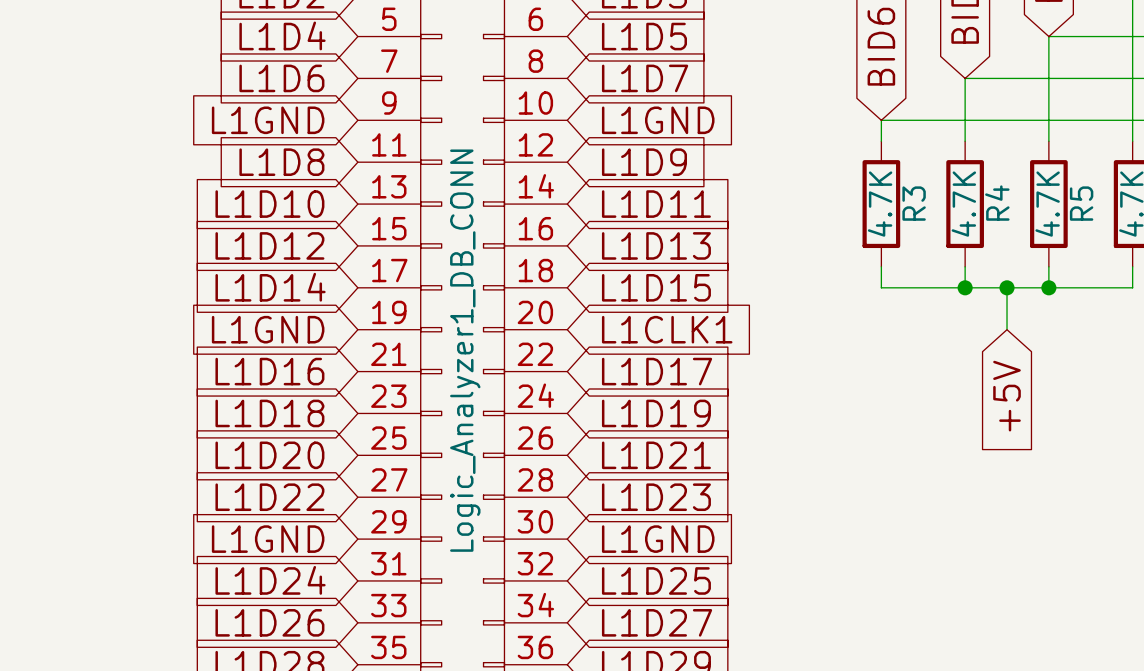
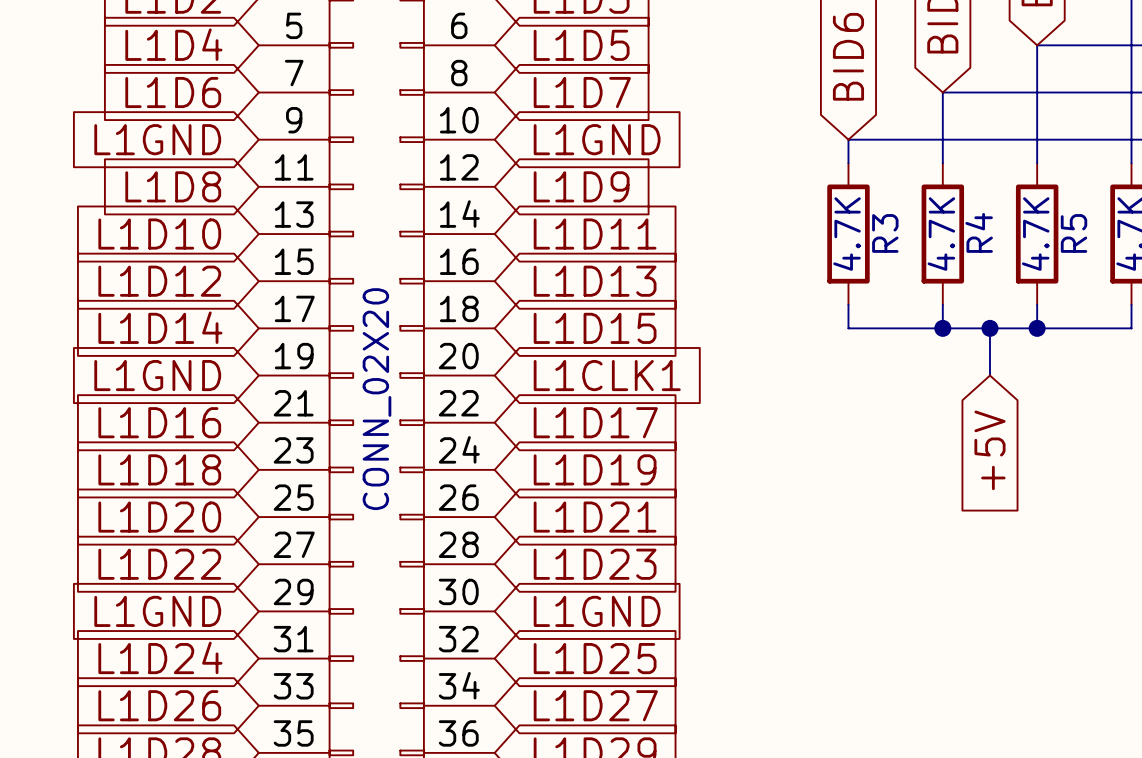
part value: Logic_Analyzer1_DB_CONN (465, 350) -> CONN_02X20 (376, 399)

